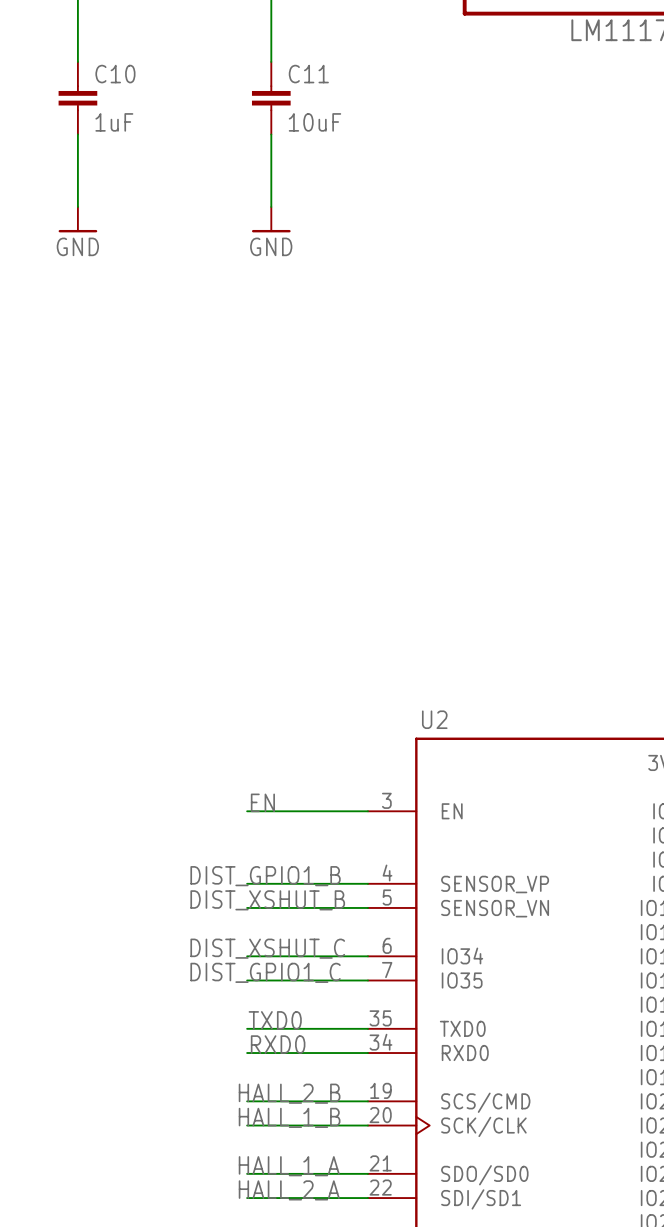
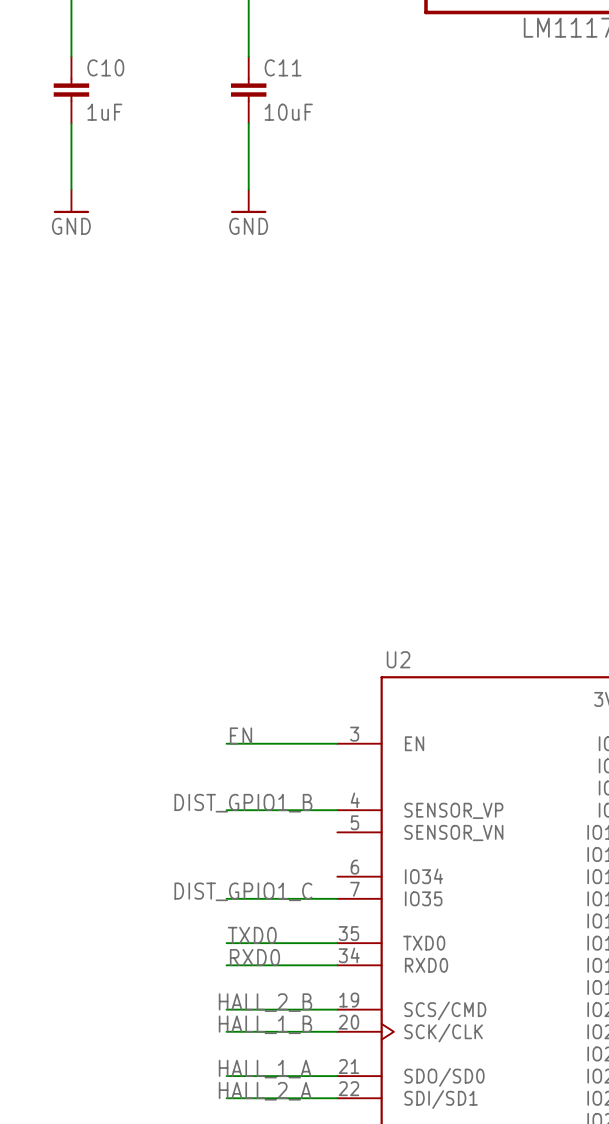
label: DIST_XSHUT_B (267, 900) -> none
wire: (247, 907) (367, 907) -> none
label: DIST_XSHUT_C (267, 948) -> none
wire: (247, 956) (367, 956) -> none

